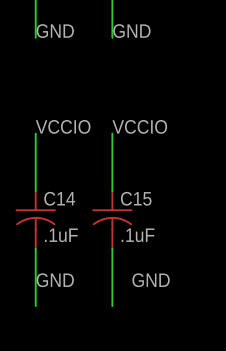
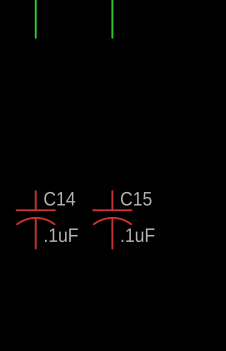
label: GND (55, 31) -> none
label: GND (131, 31) -> none
label: VCCIO (63, 126) -> none
label: VCCIO (139, 126) -> none
wire: (35, 133) (35, 191) -> none
wire: (112, 133) (112, 191) -> none
wire: (35, 248) (35, 306) -> none
wire: (112, 248) (112, 306) -> none
label: GND (55, 280) -> none
label: GND (151, 280) -> none

